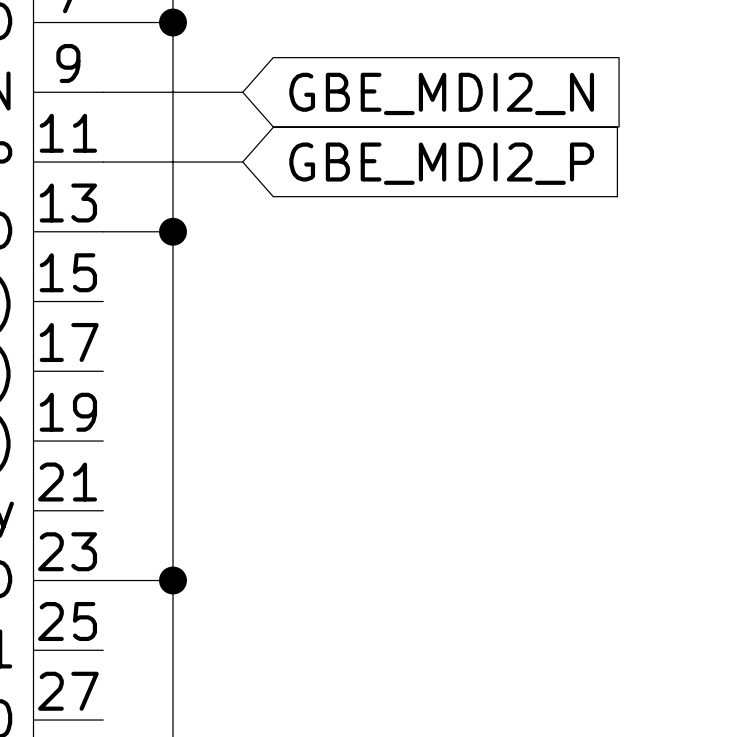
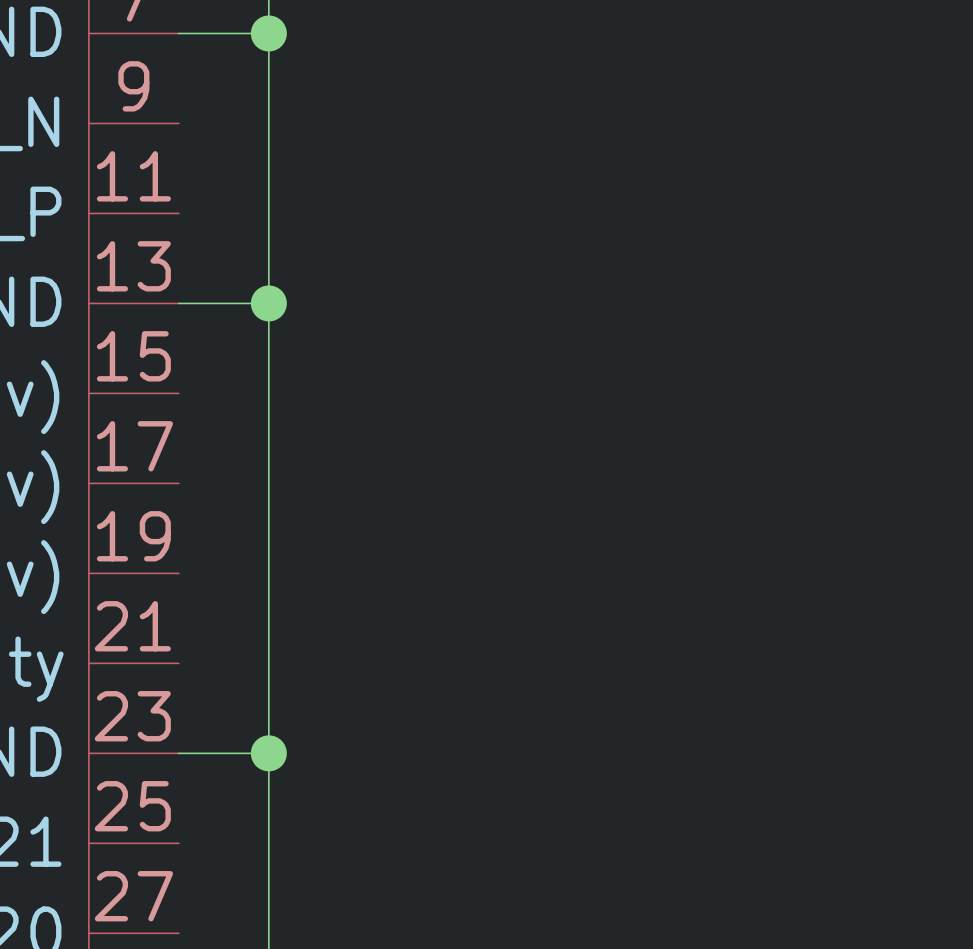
wire: (103, 92) (242, 92) -> none
global label: GBE_MDI2_N (441, 93) -> none
wire: (103, 162) (242, 162) -> none
global label: GBE_MDI2_P (441, 163) -> none

